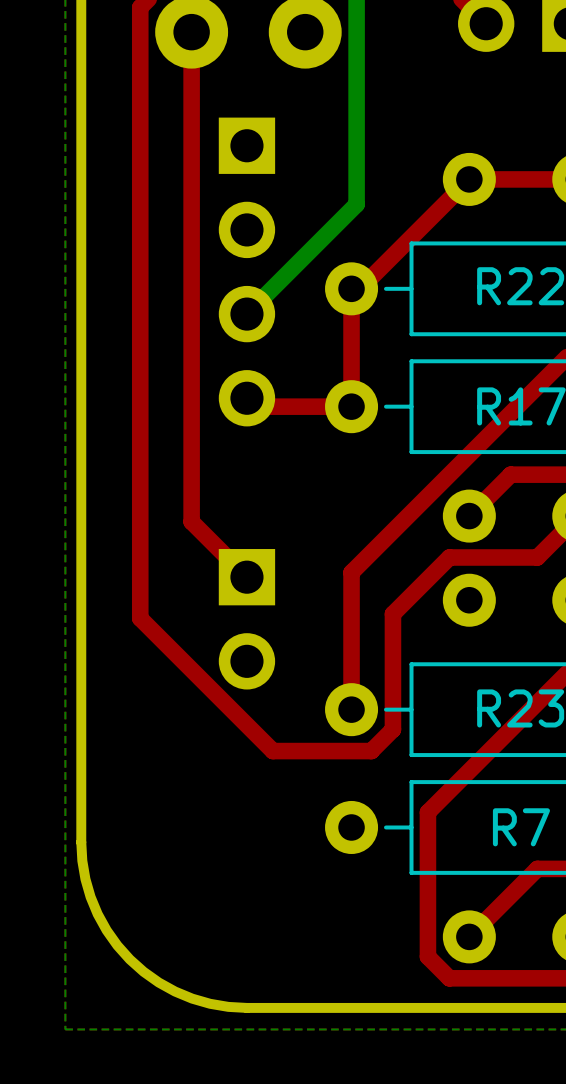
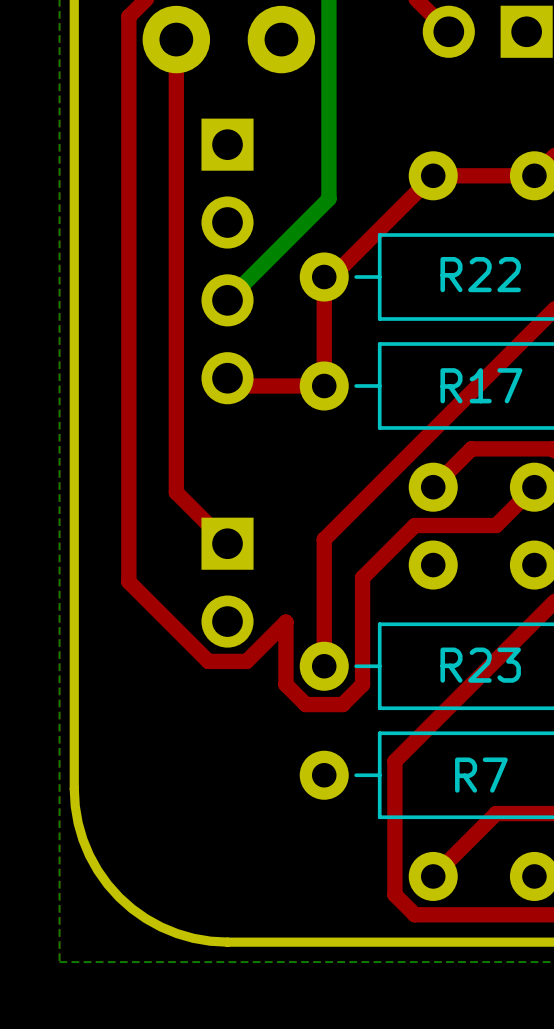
top track: (226, 704) (272, 751) (331, 751) -> (208, 661) (246, 661) (285, 622) (285, 684) (305, 704)

